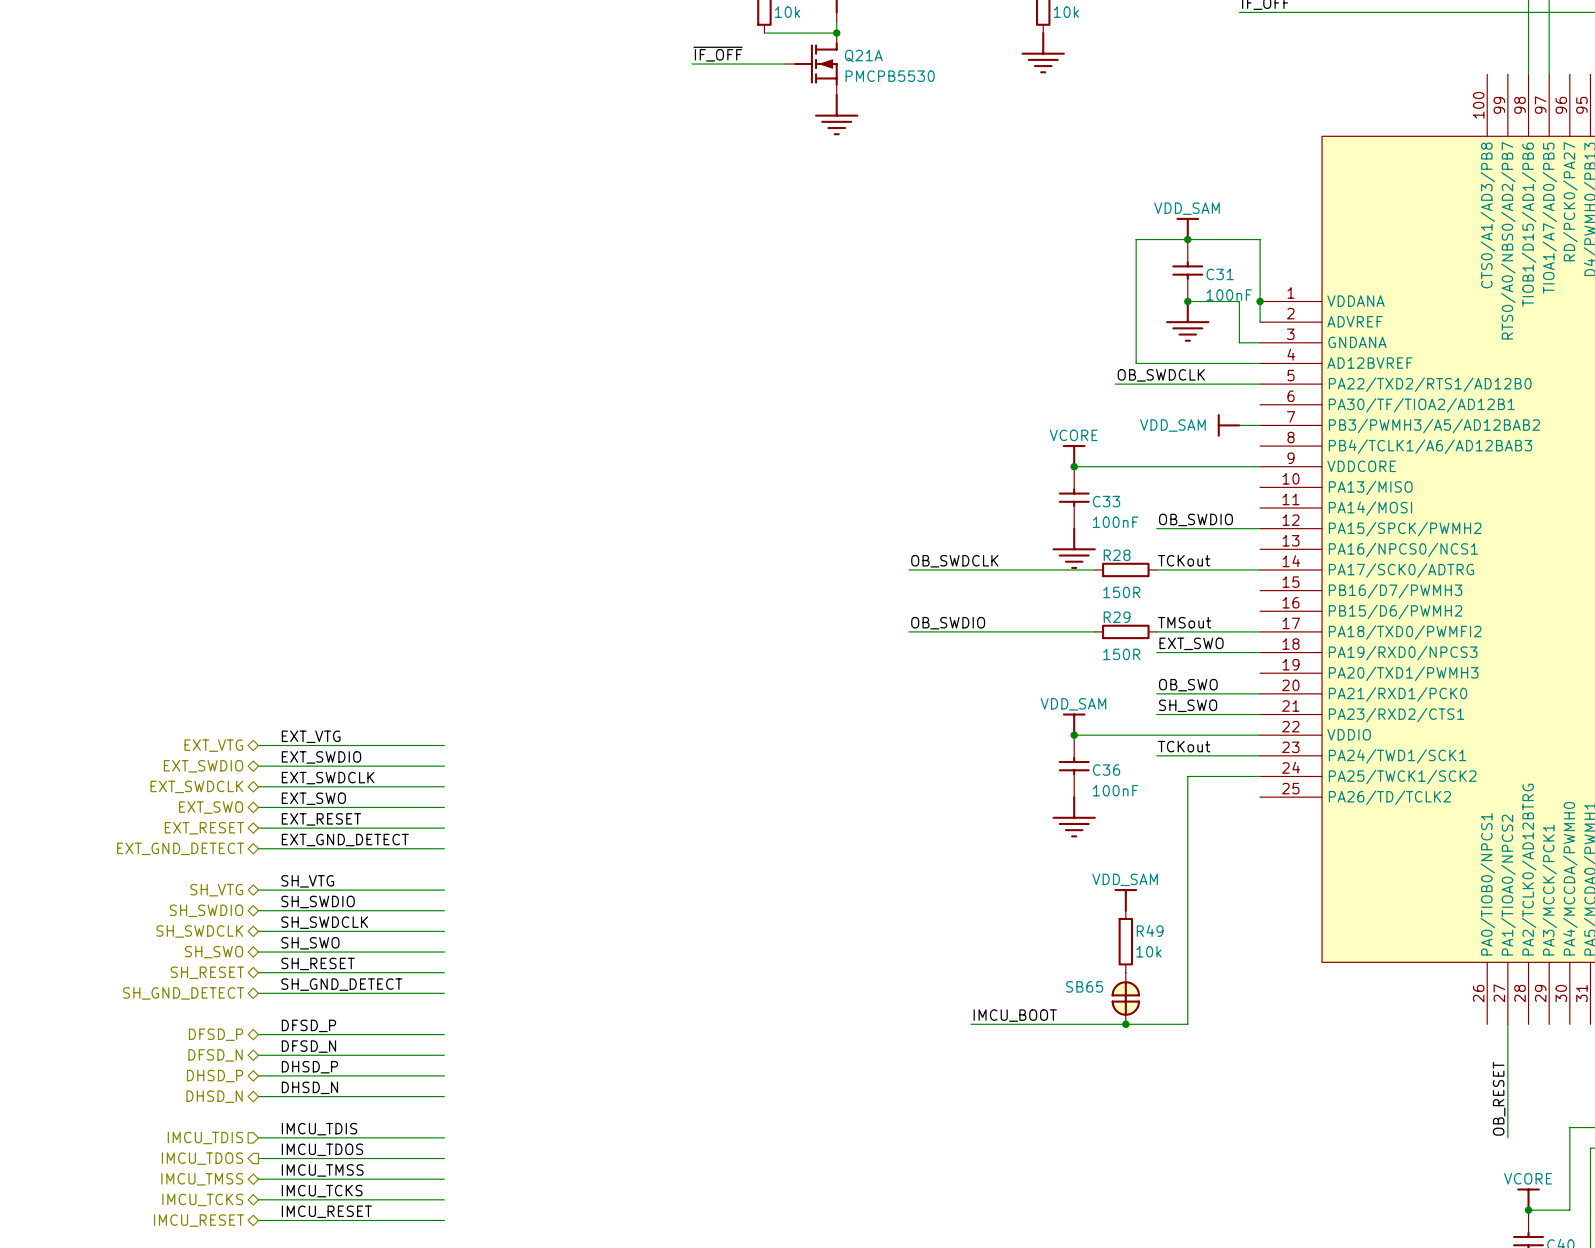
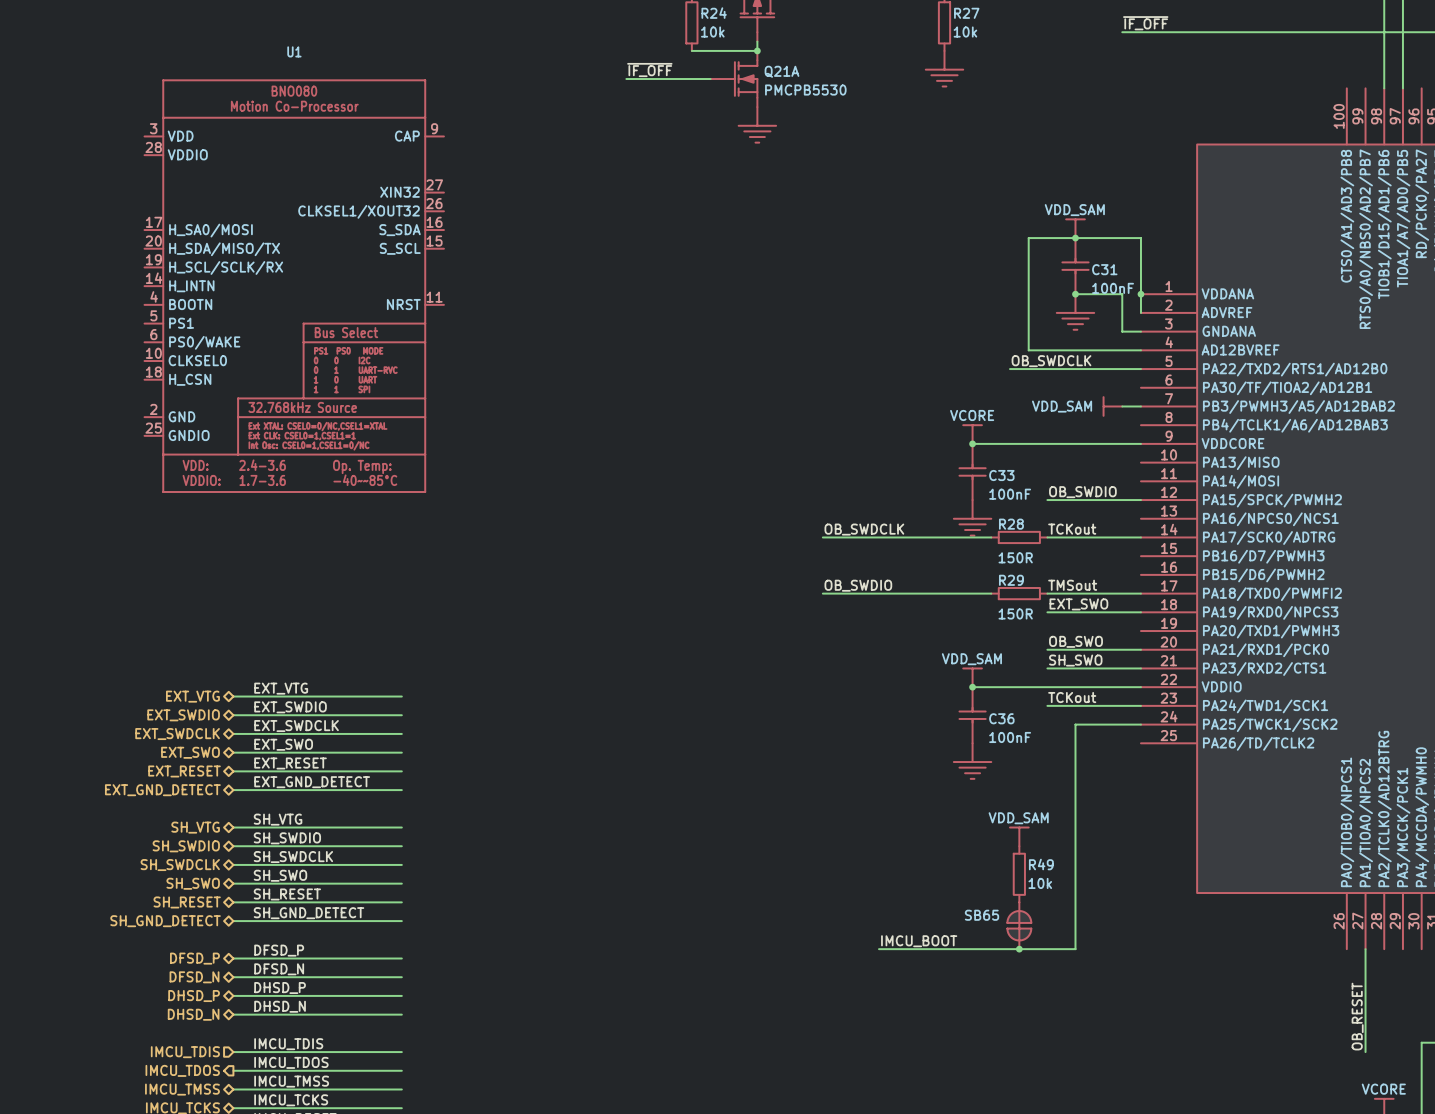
U1: none -> (294, 286)

